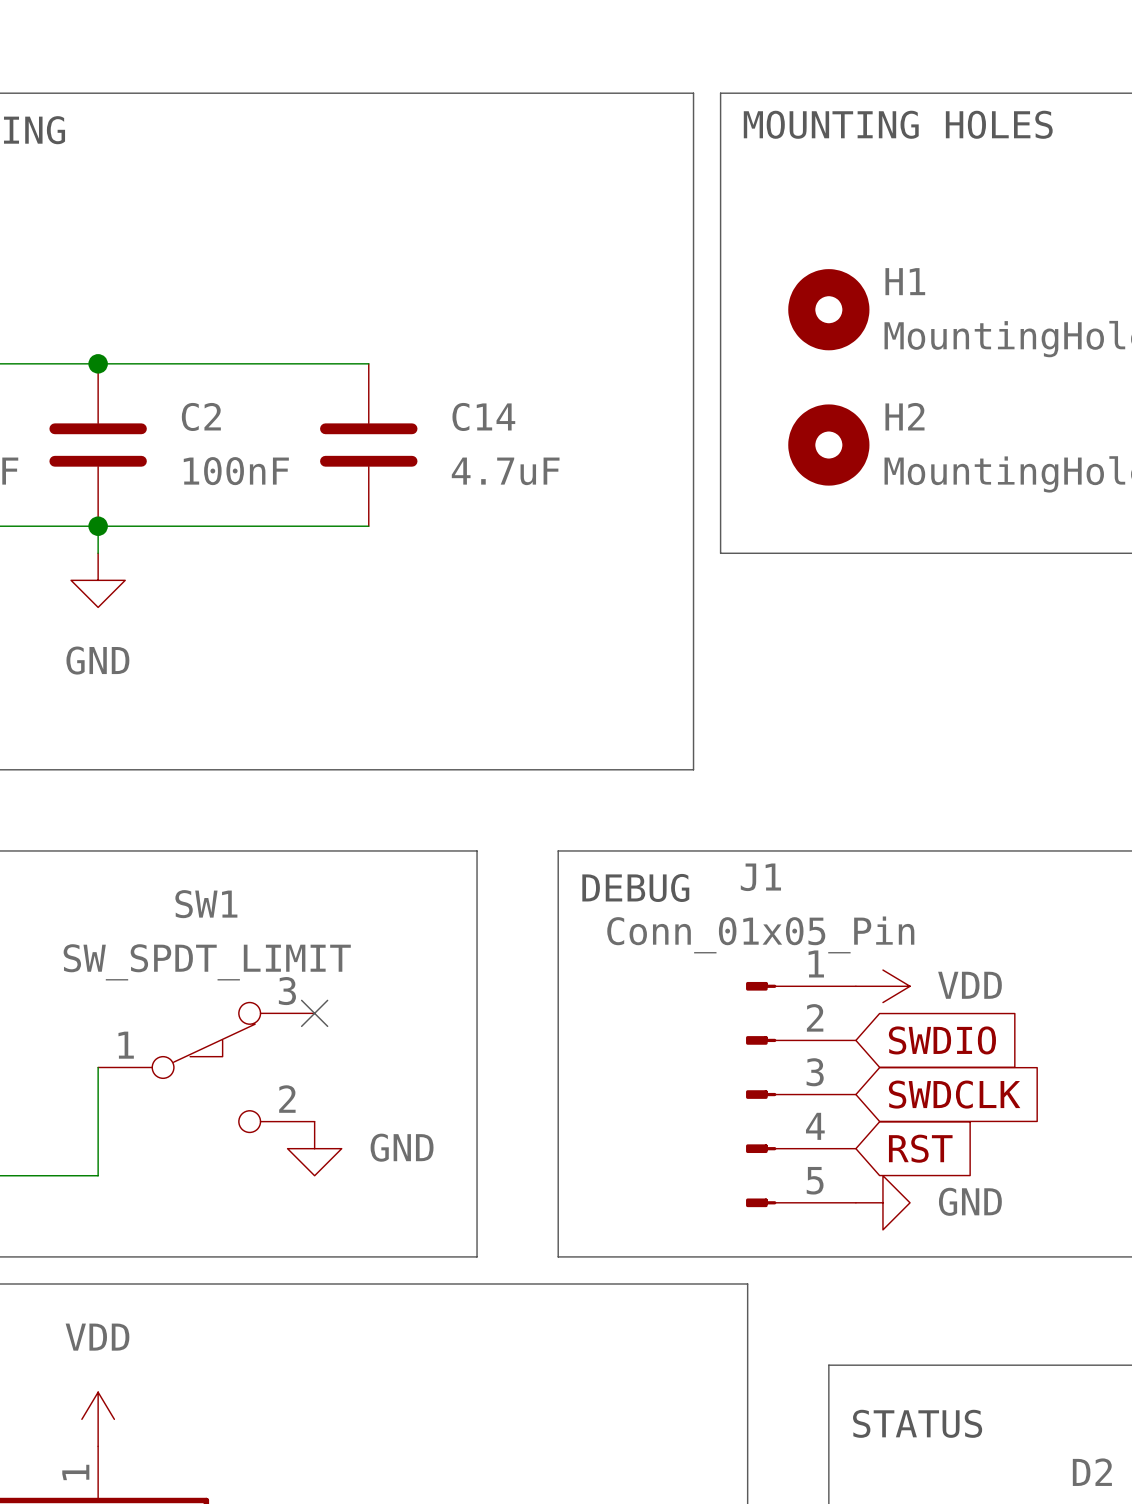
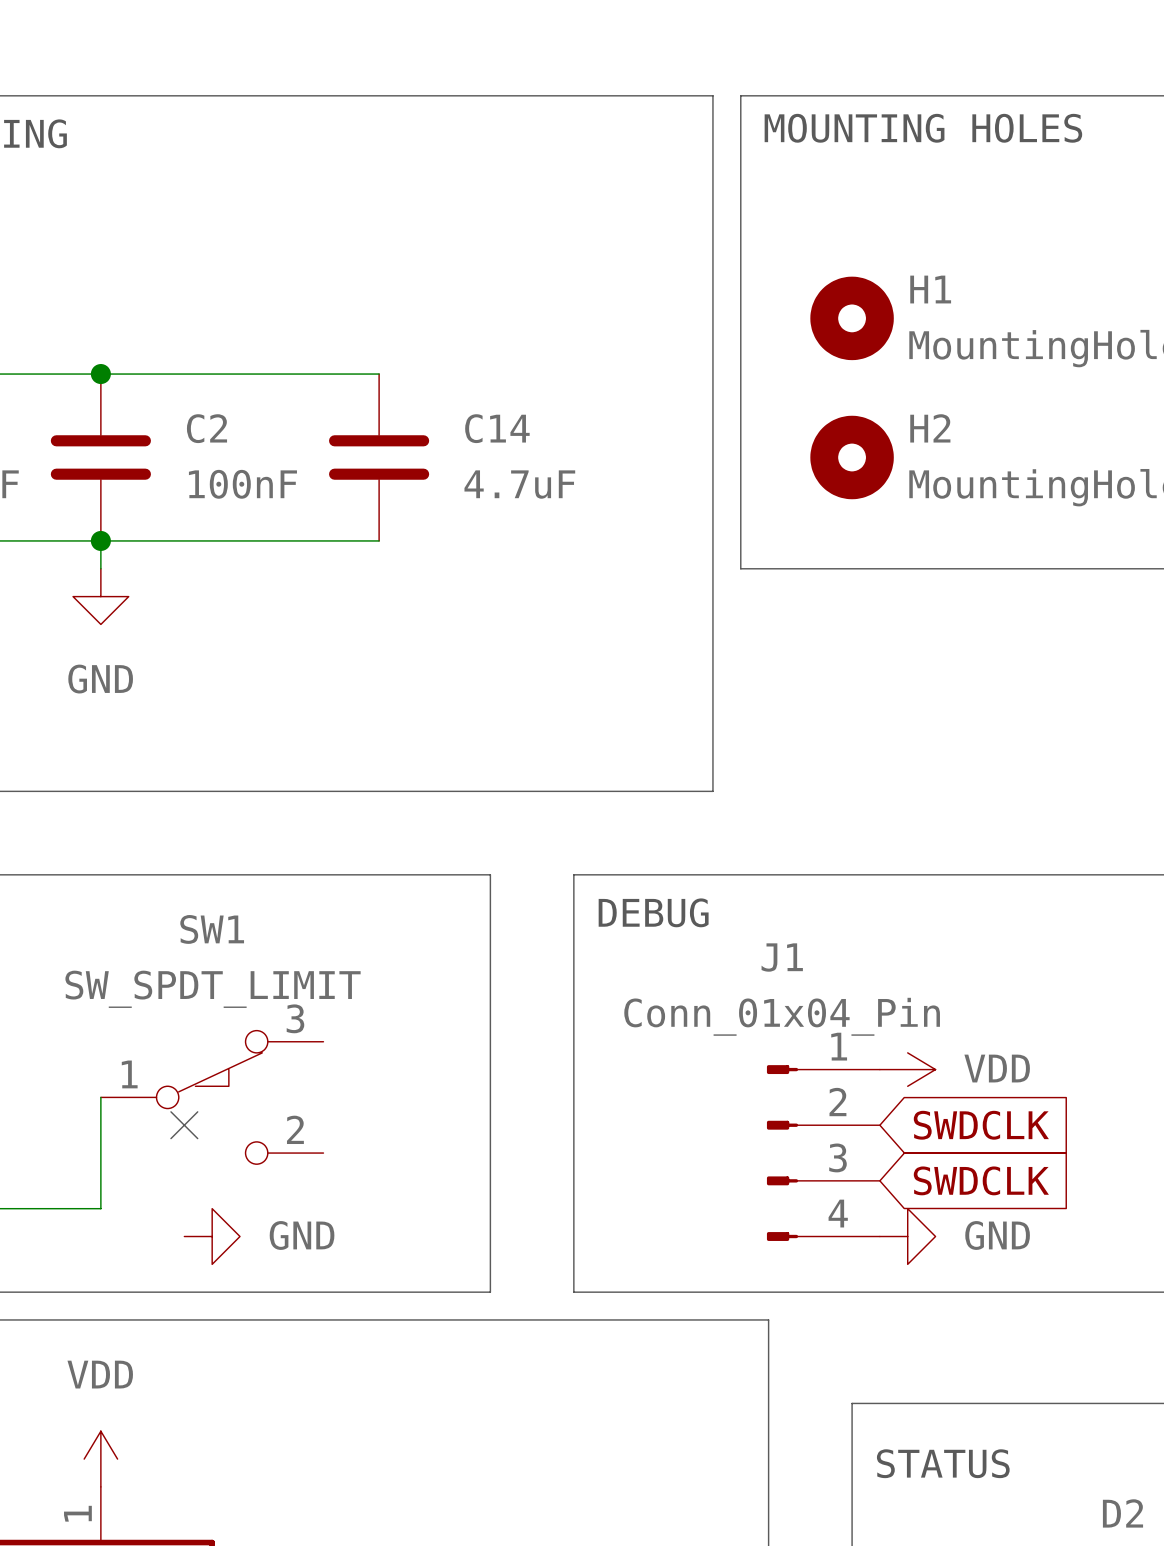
J1 value: Conn_01x05_Pin (760, 934) -> Conn_01x04_Pin (782, 1016)
J1 symbol: [746, 981, 856, 1208] -> [766, 1065, 880, 1241]
power symbol position: VDD (882, 986) -> VDD (907, 1069)
no-connect mark: (314, 1013) -> none
global label: SWDIO (942, 1040) -> none
no-connect mark: none -> (184, 1125)
power symbol rotation: 0° (314, 1148) -> 90° counterclockwise (212, 1236)
power symbol position: GND (314, 1148) -> GND (212, 1236)
global label: RST (920, 1148) -> SWDCLK (981, 1180)

